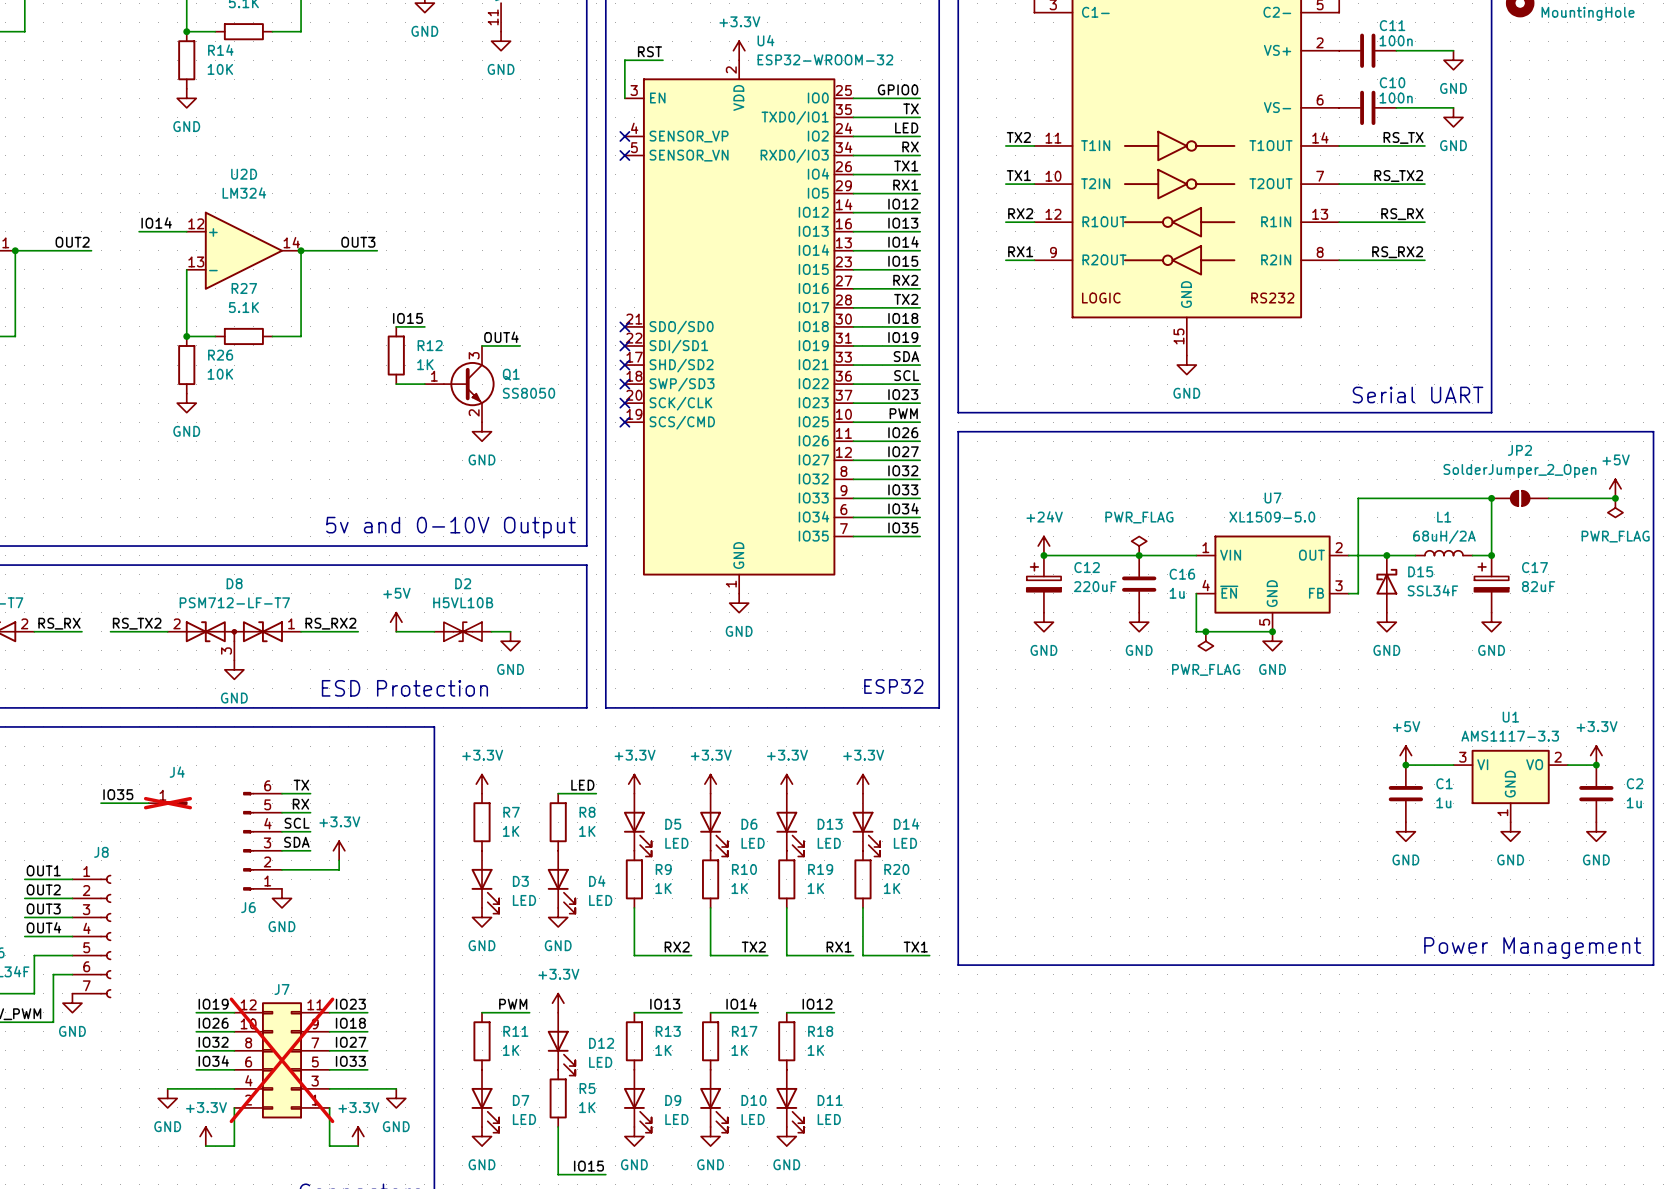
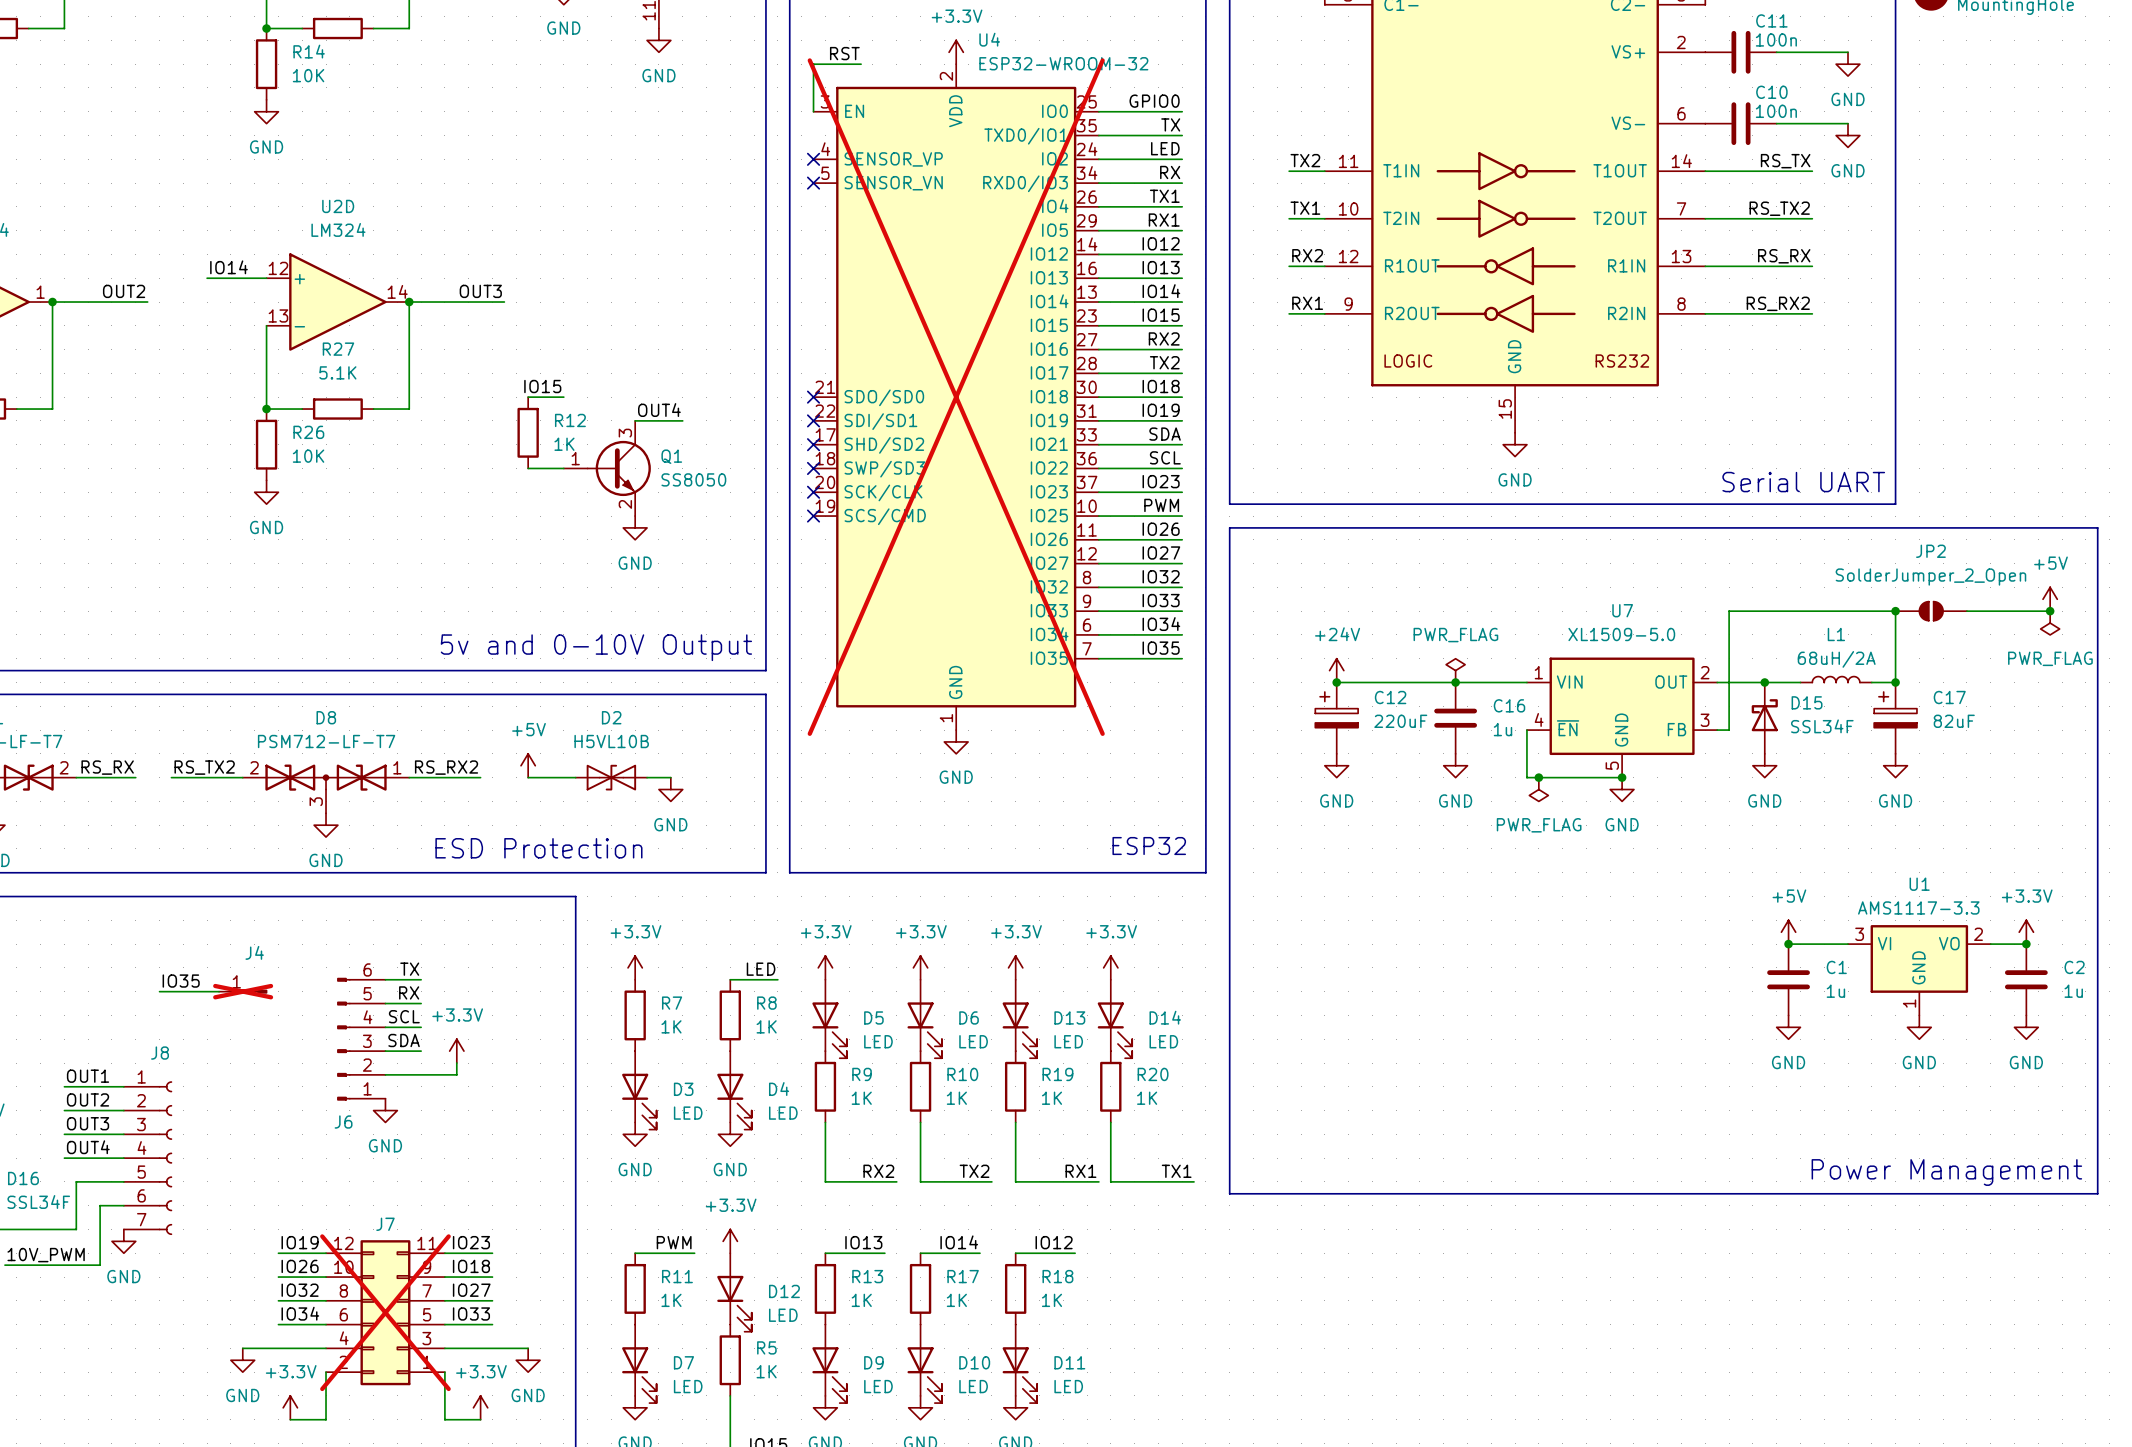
U4 do-not-place cross: none -> (956, 397)

